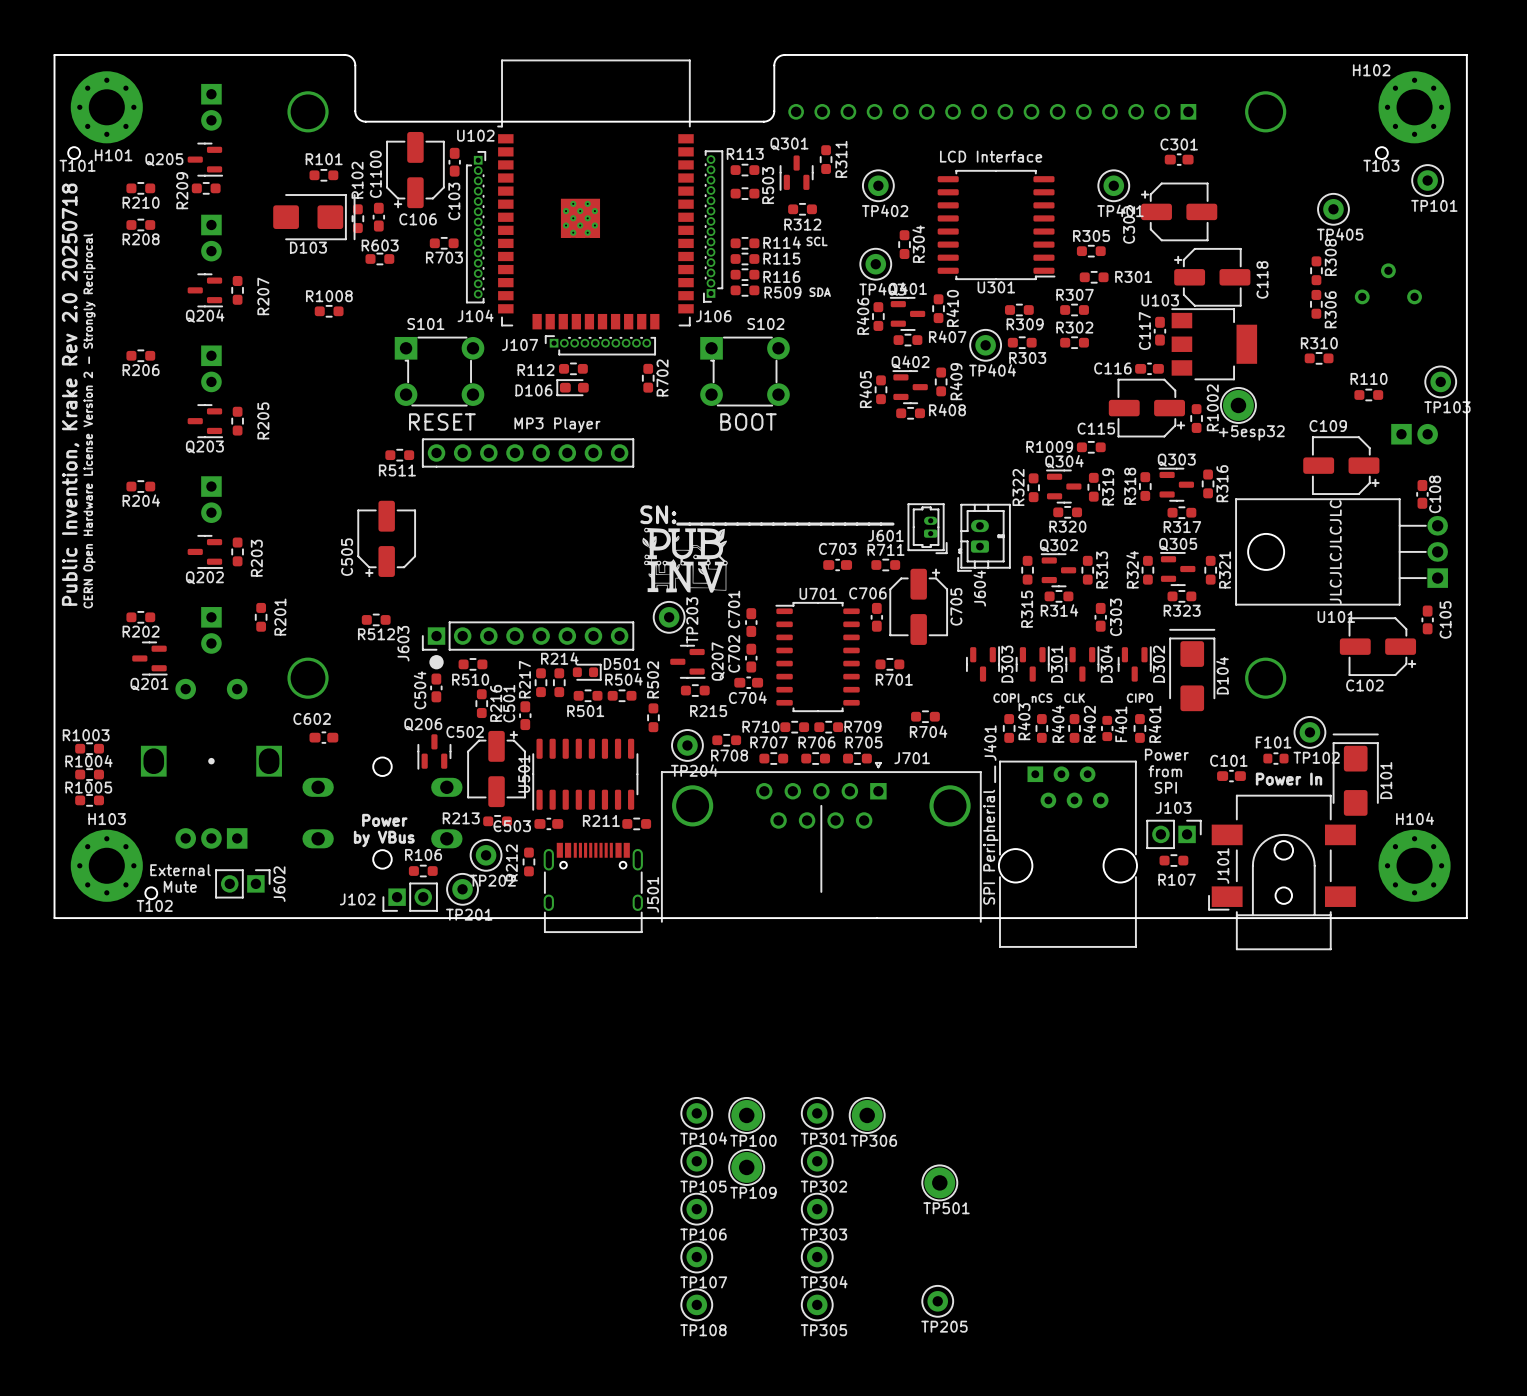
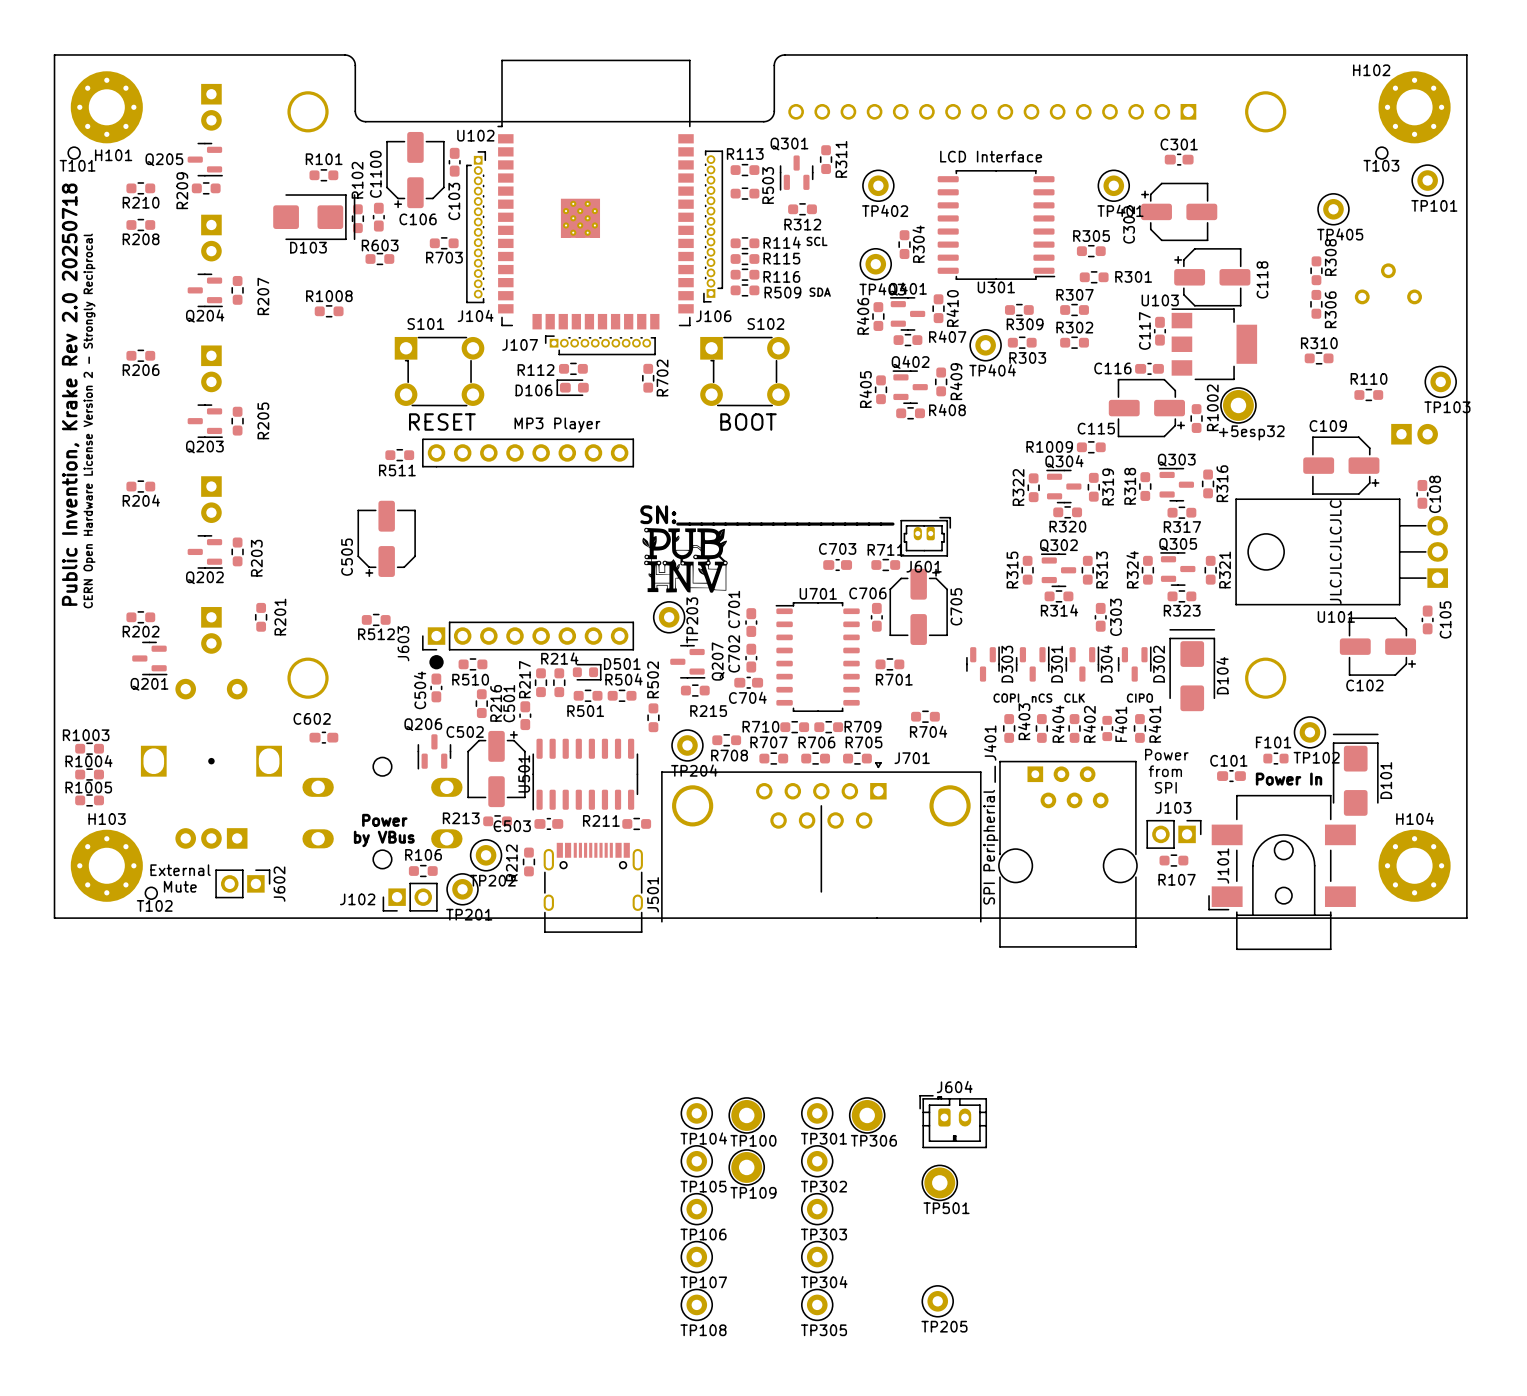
J601 rotation: 0° (927, 528) -> 90° counterclockwise (925, 536)
J604 rotation: 0° (984, 537) -> 90° clockwise (953, 1121)
J604 position: (984, 537) -> (953, 1121)
J604 name position: J604 (979, 588) -> J604 (954, 1087)
R315 name position: R315 (1027, 609) -> R315 (1012, 569)

